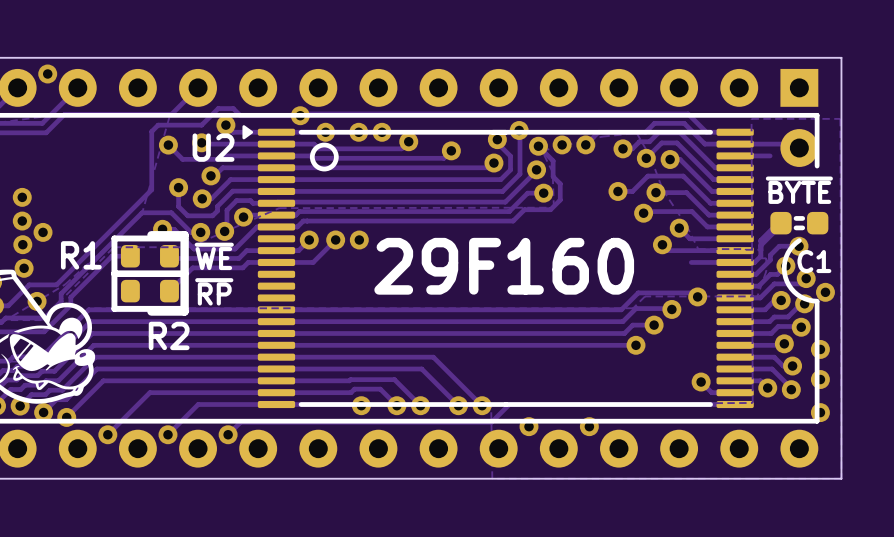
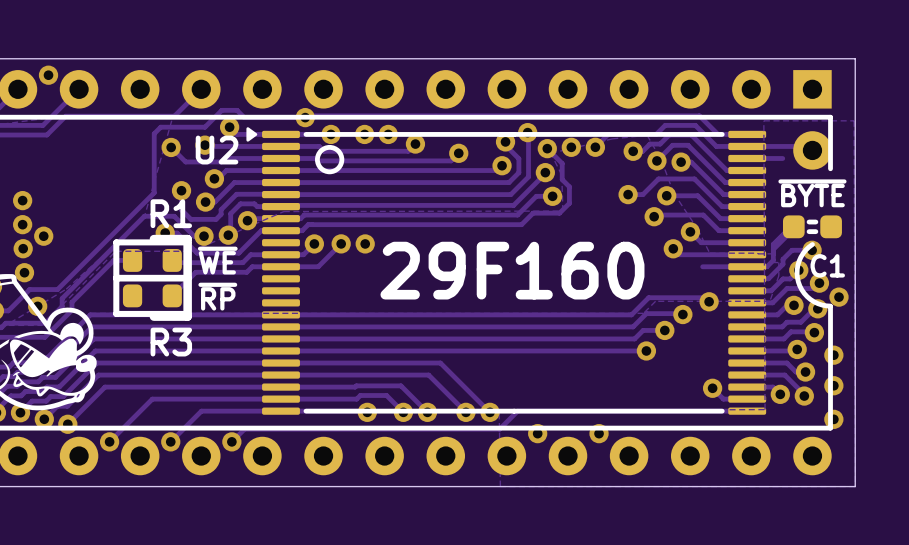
R1 name position: R1 (81, 255) -> R1 (171, 213)
R2 name: R2 (169, 335) -> R3 (171, 342)

